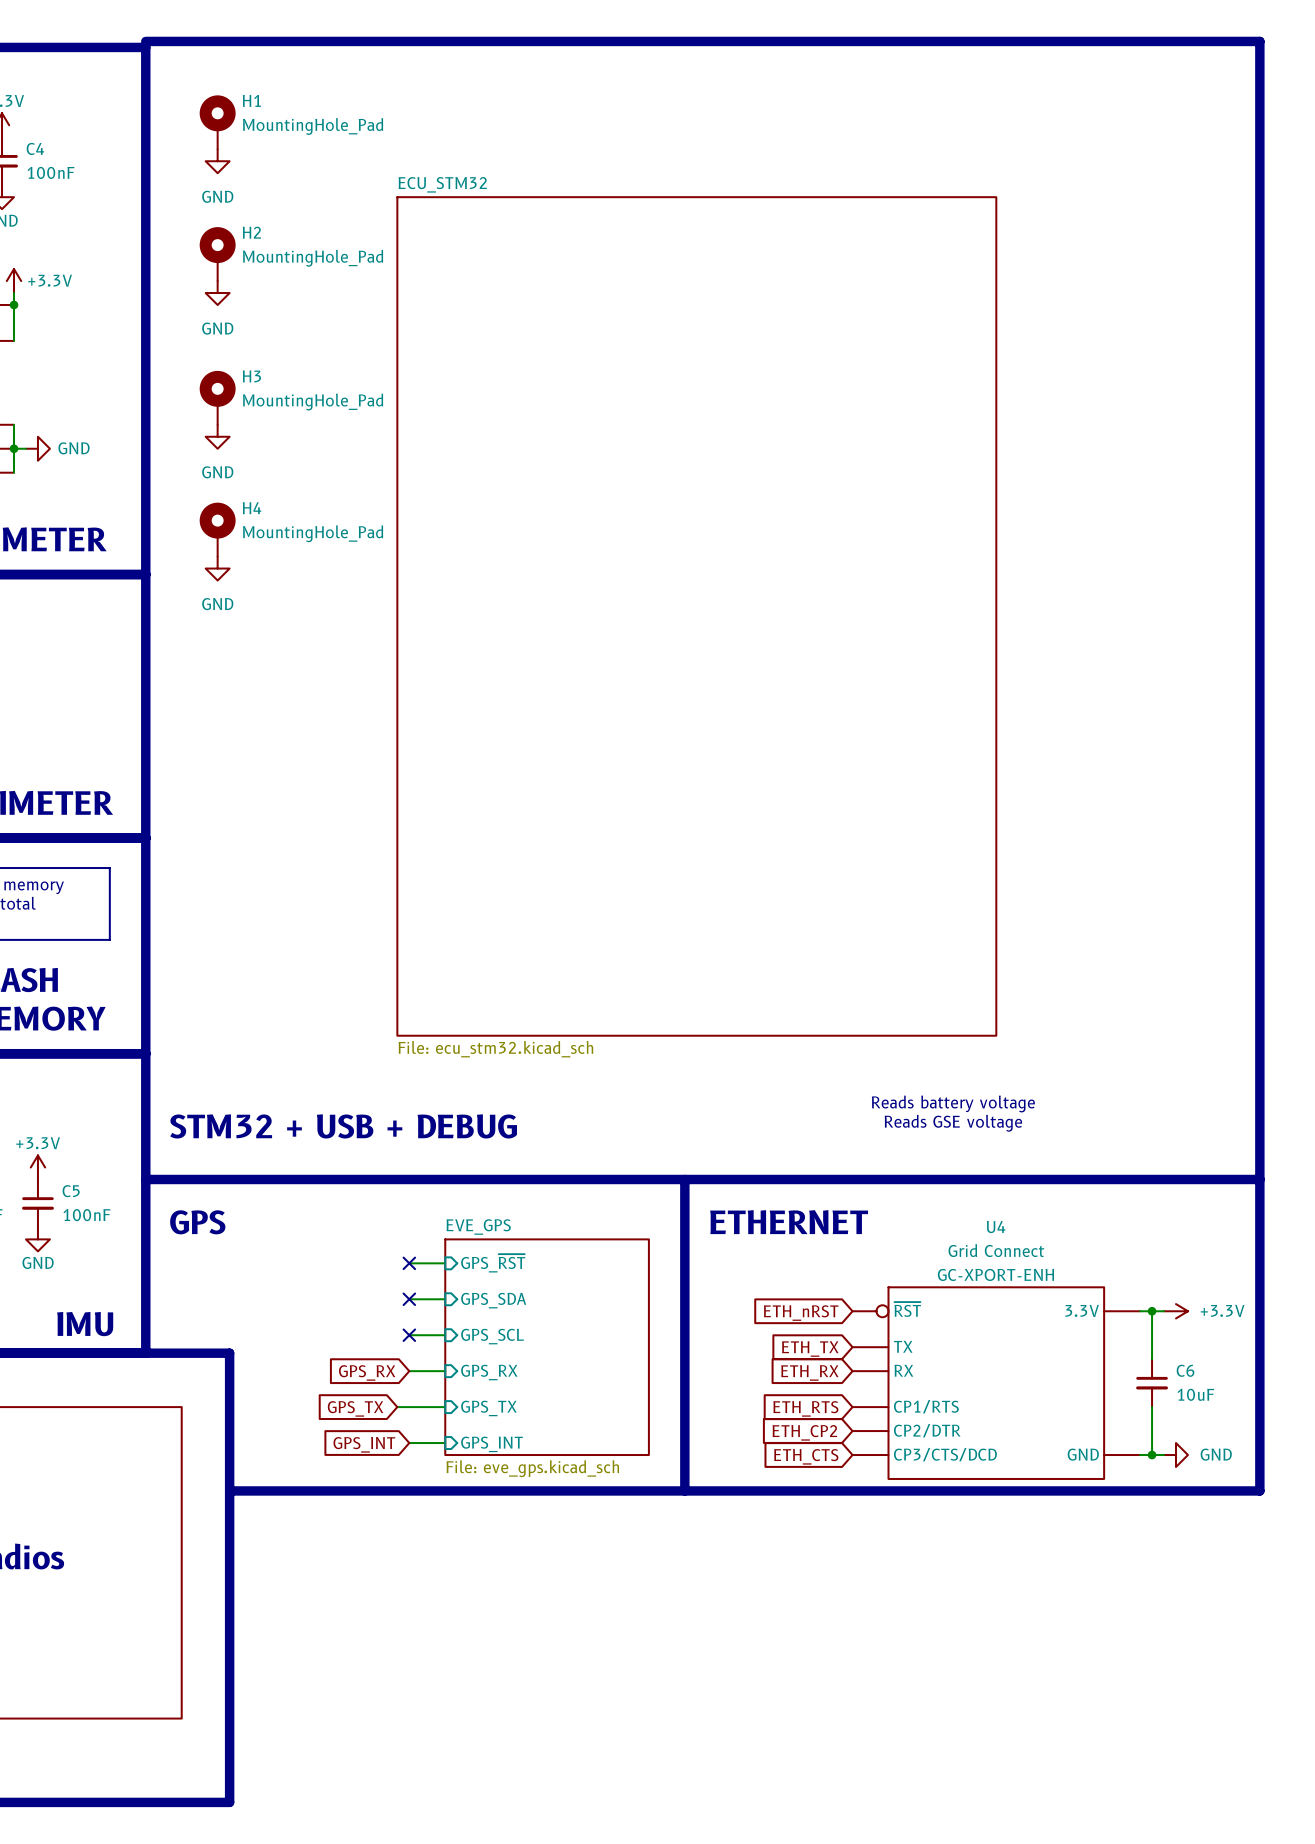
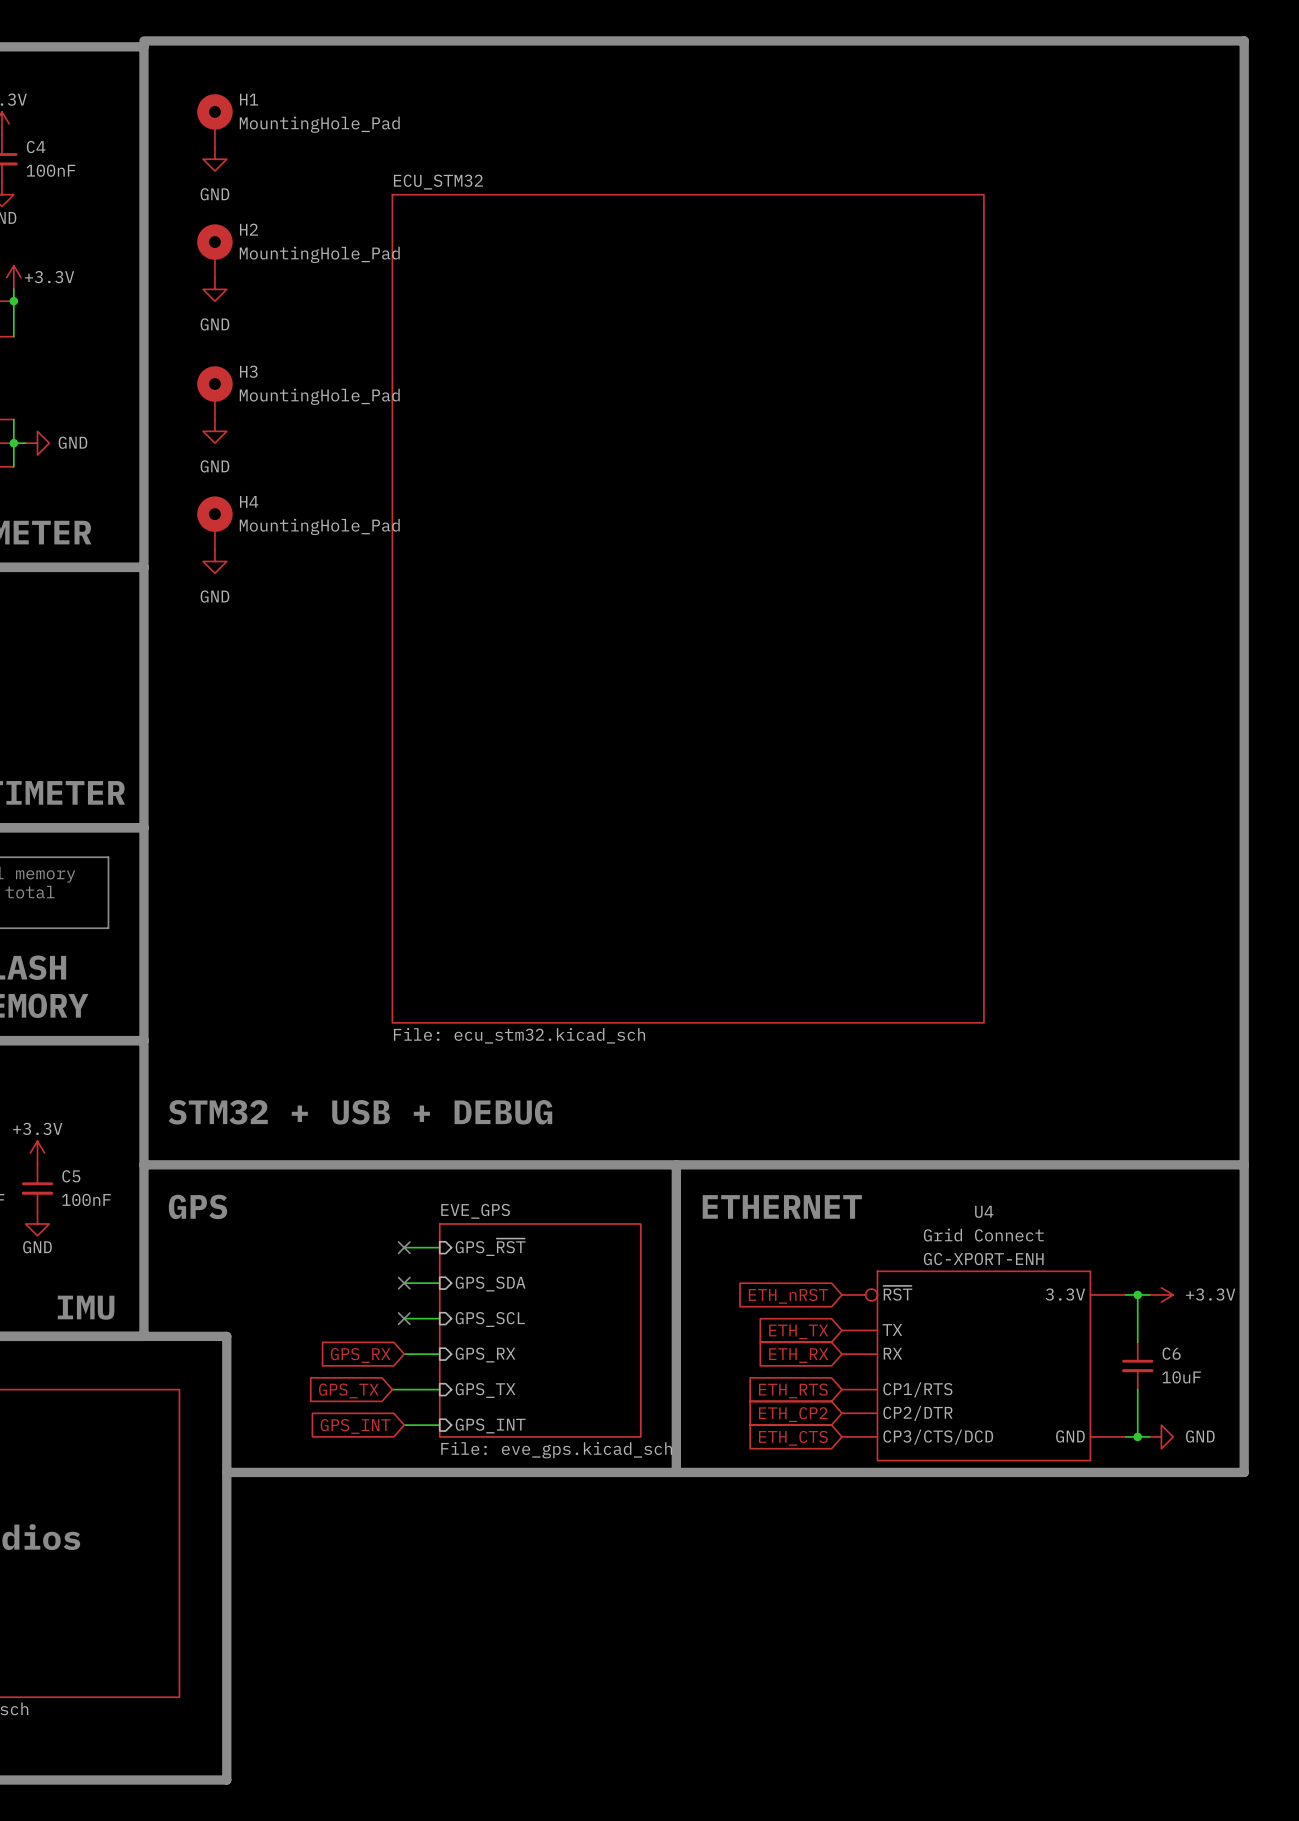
text: Reads battery voltage (953, 1103) -> none
text: Reads GSE voltage (953, 1123) -> none

